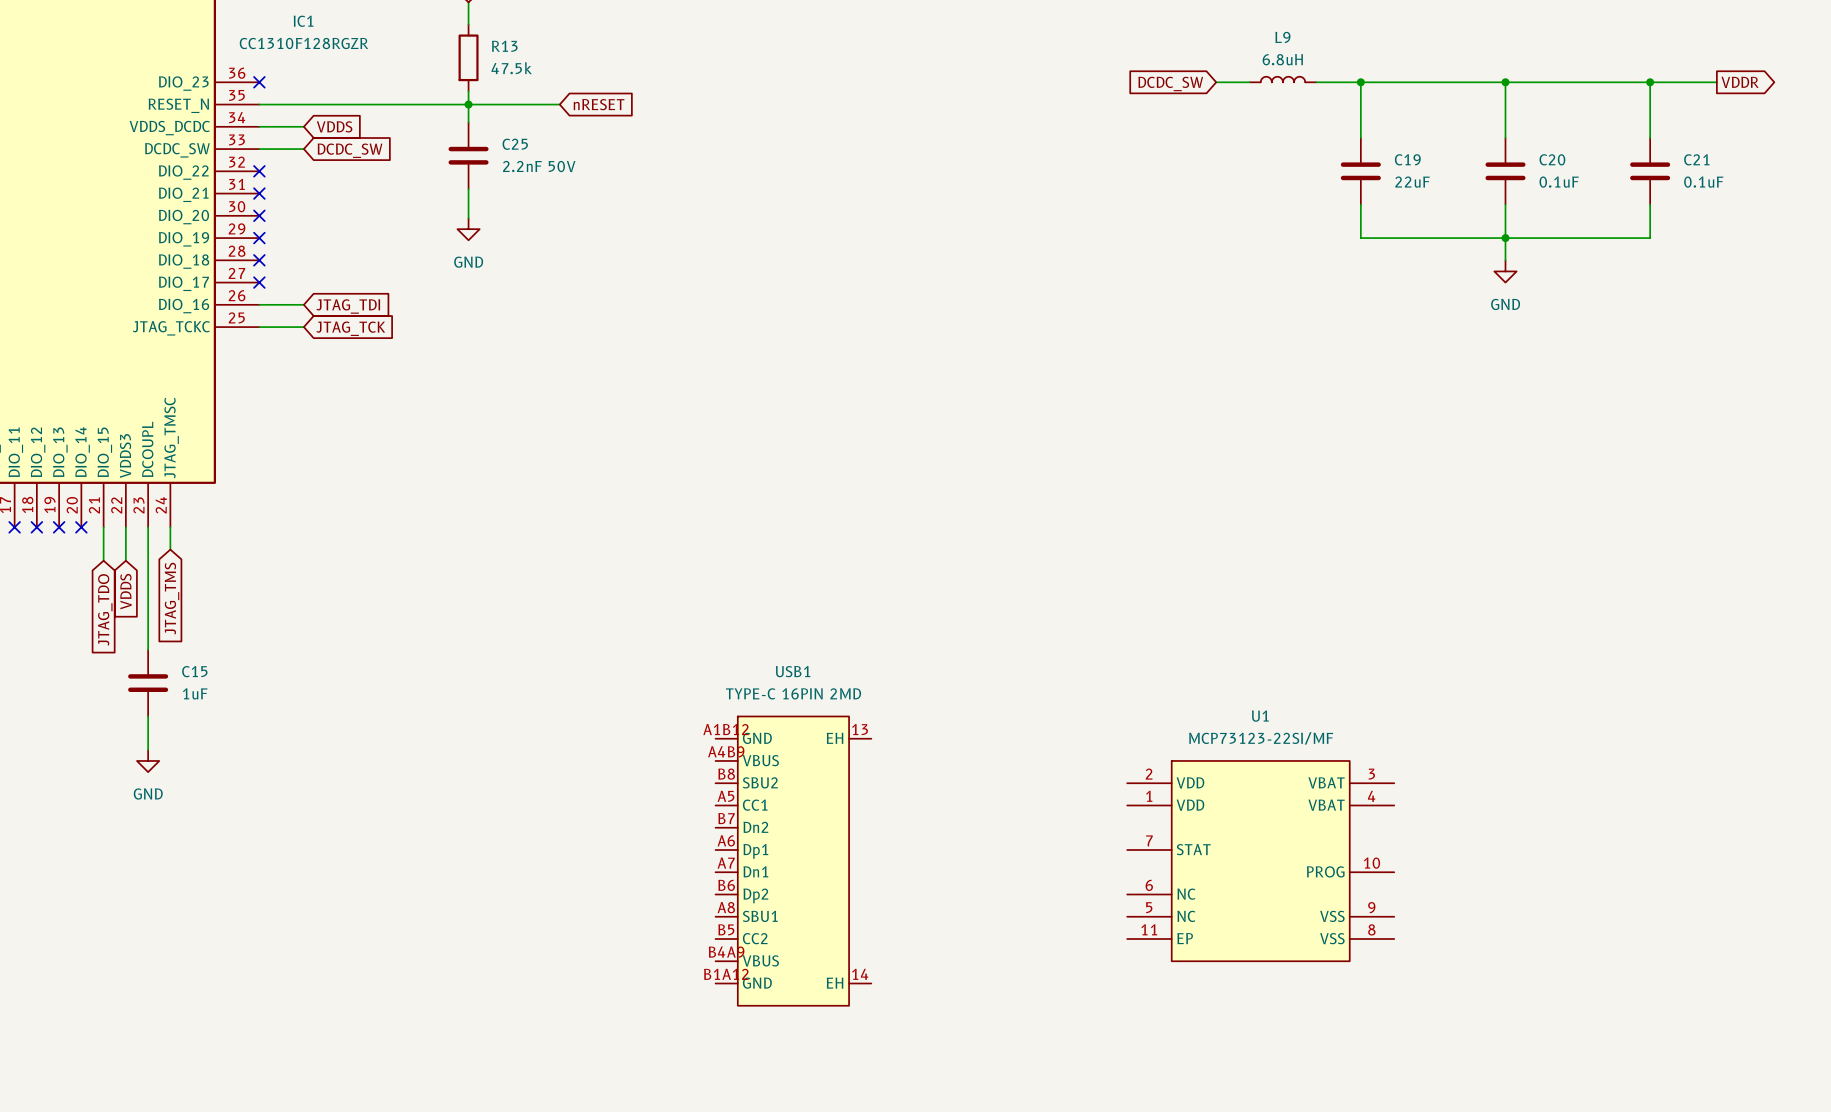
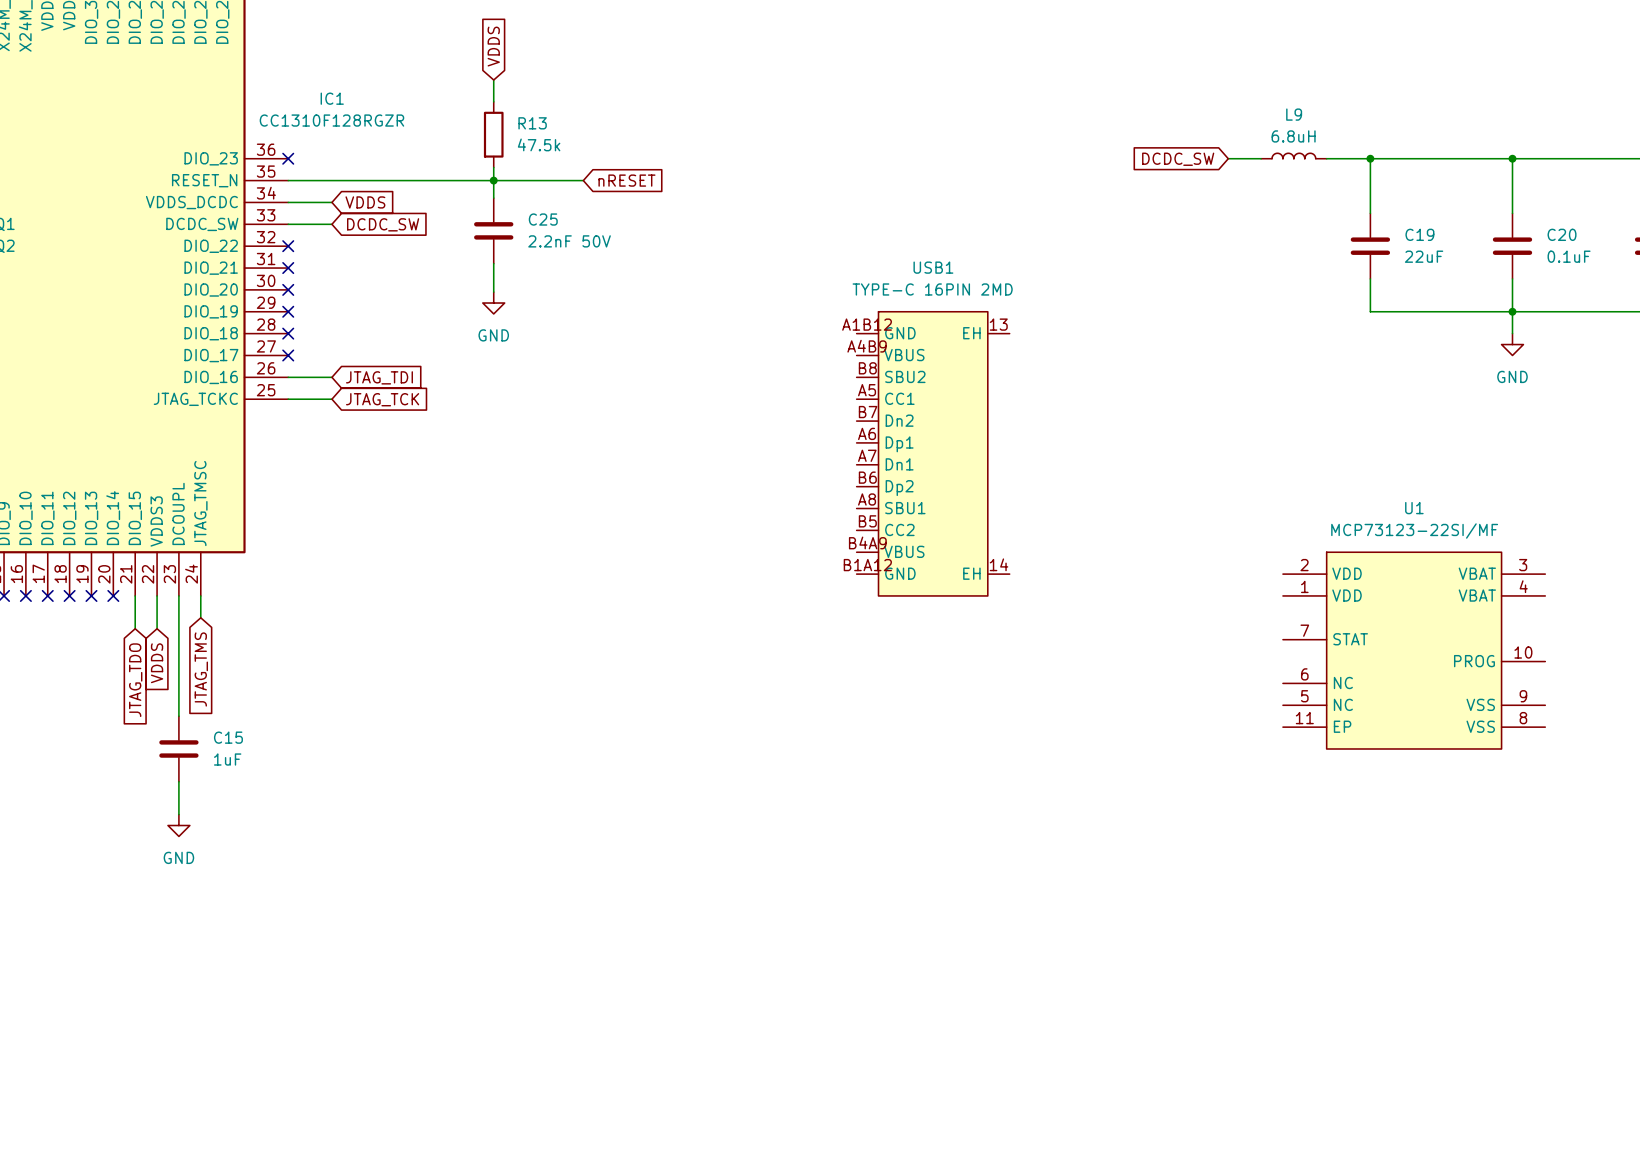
USB1 position: (793, 861) -> (933, 453)
U1 position: (1260, 861) -> (1414, 650)

